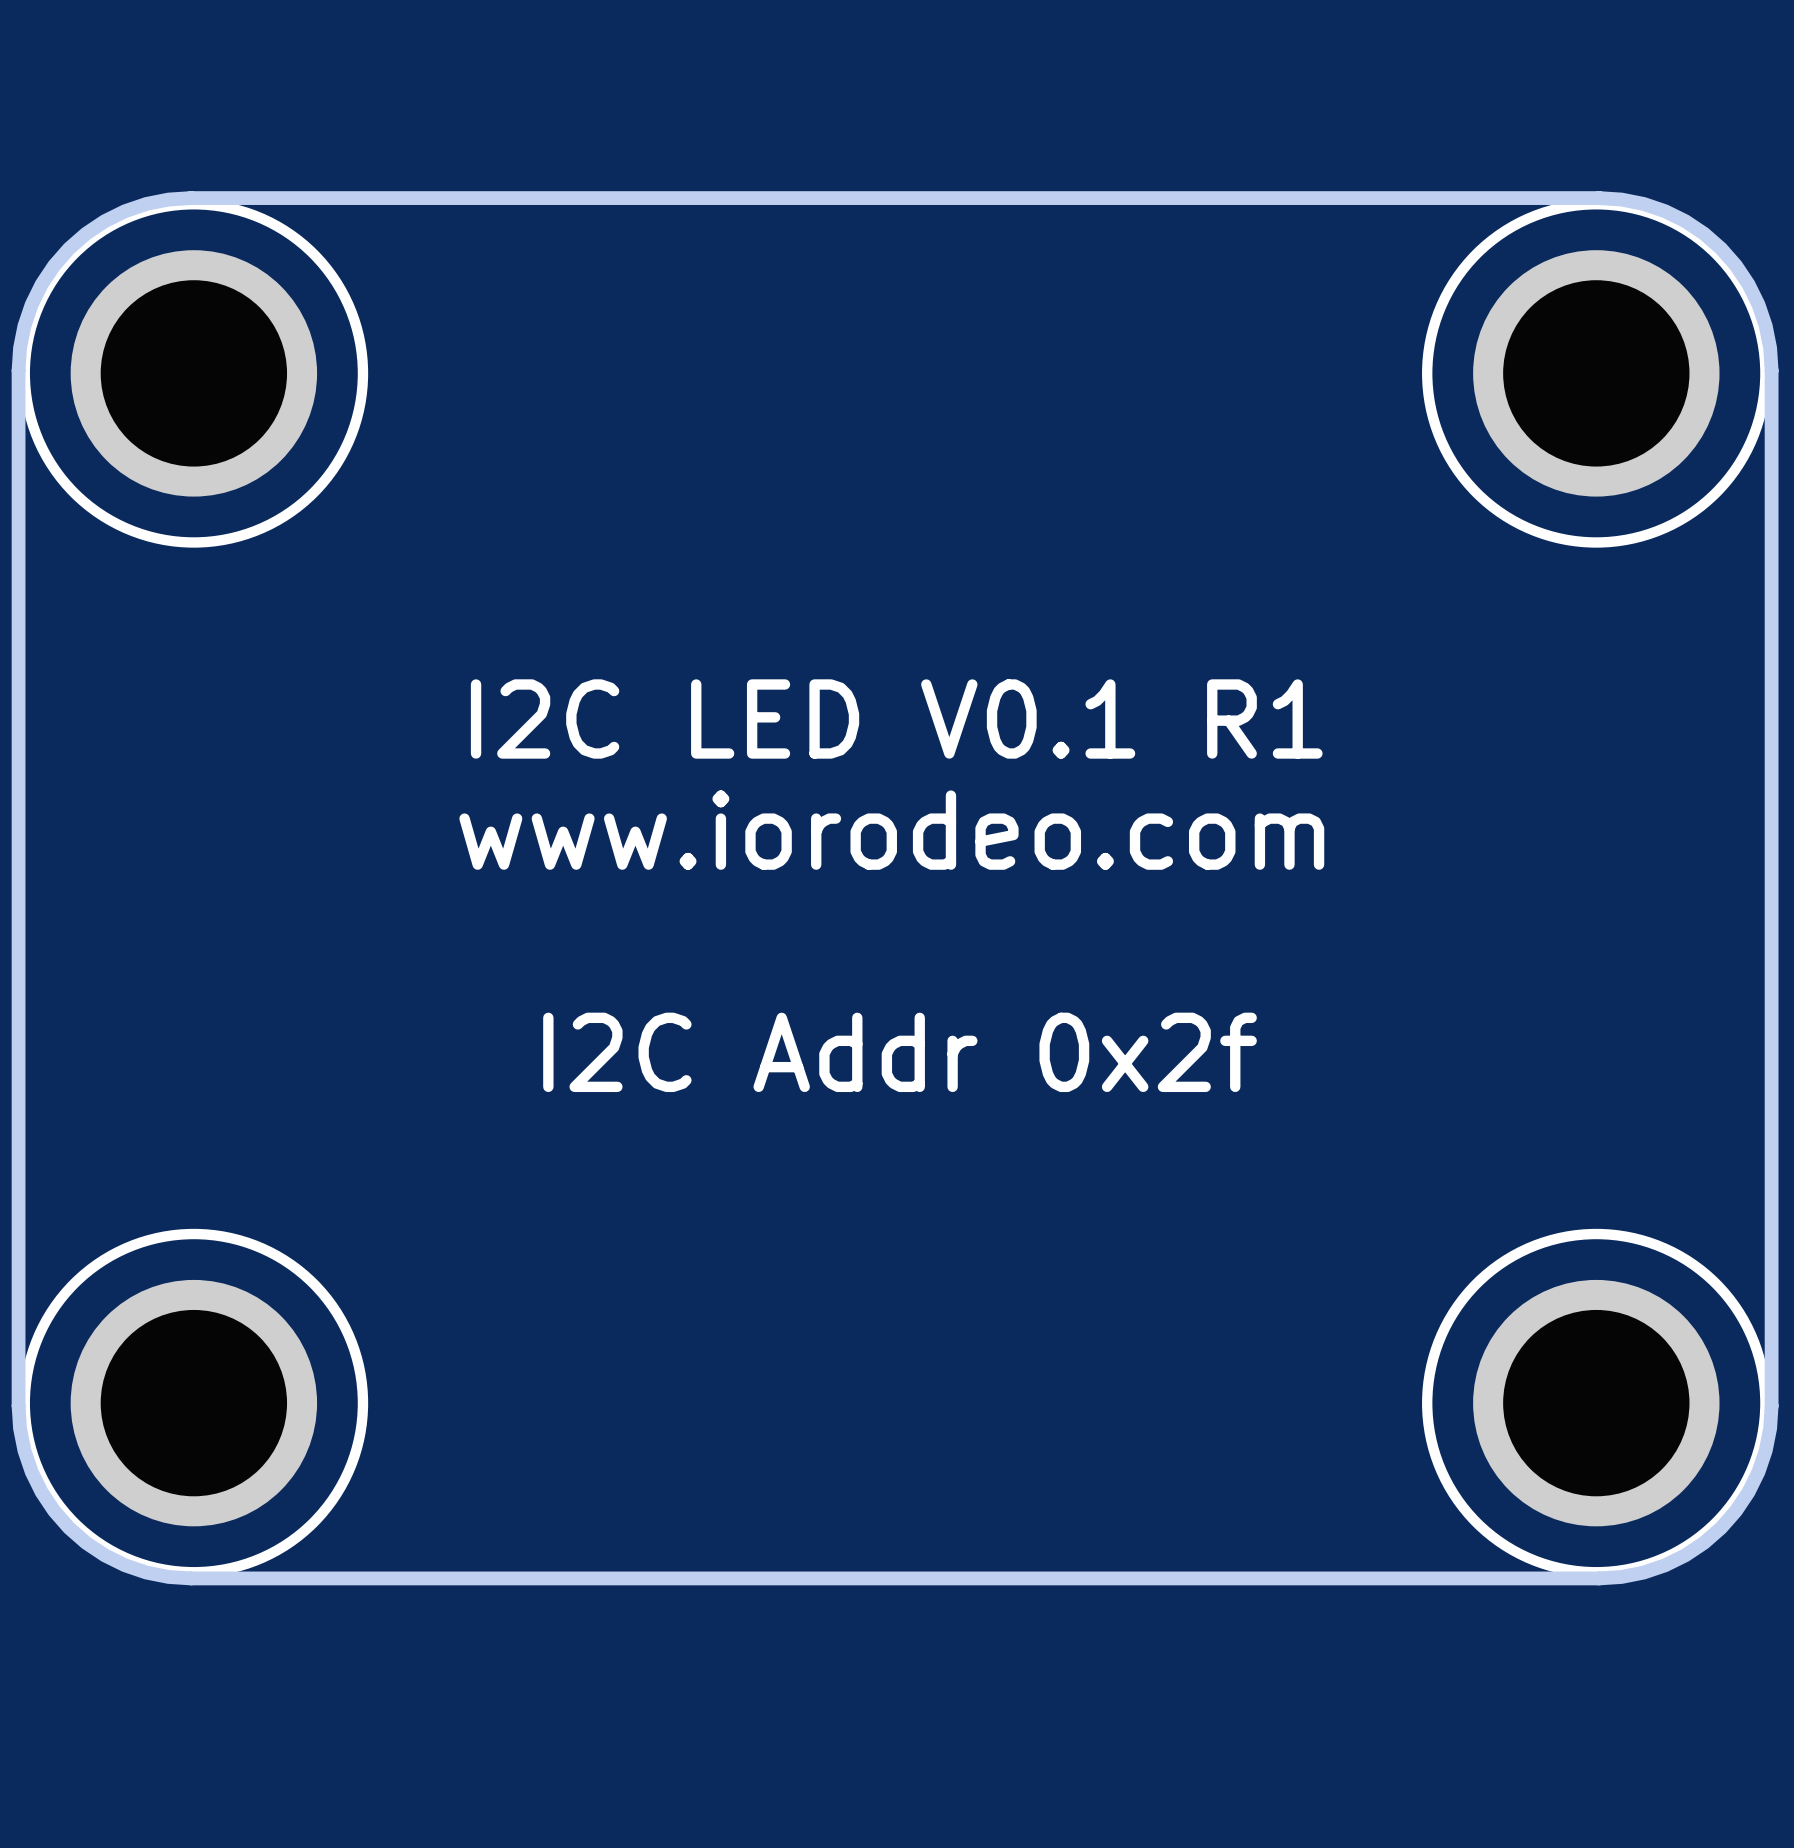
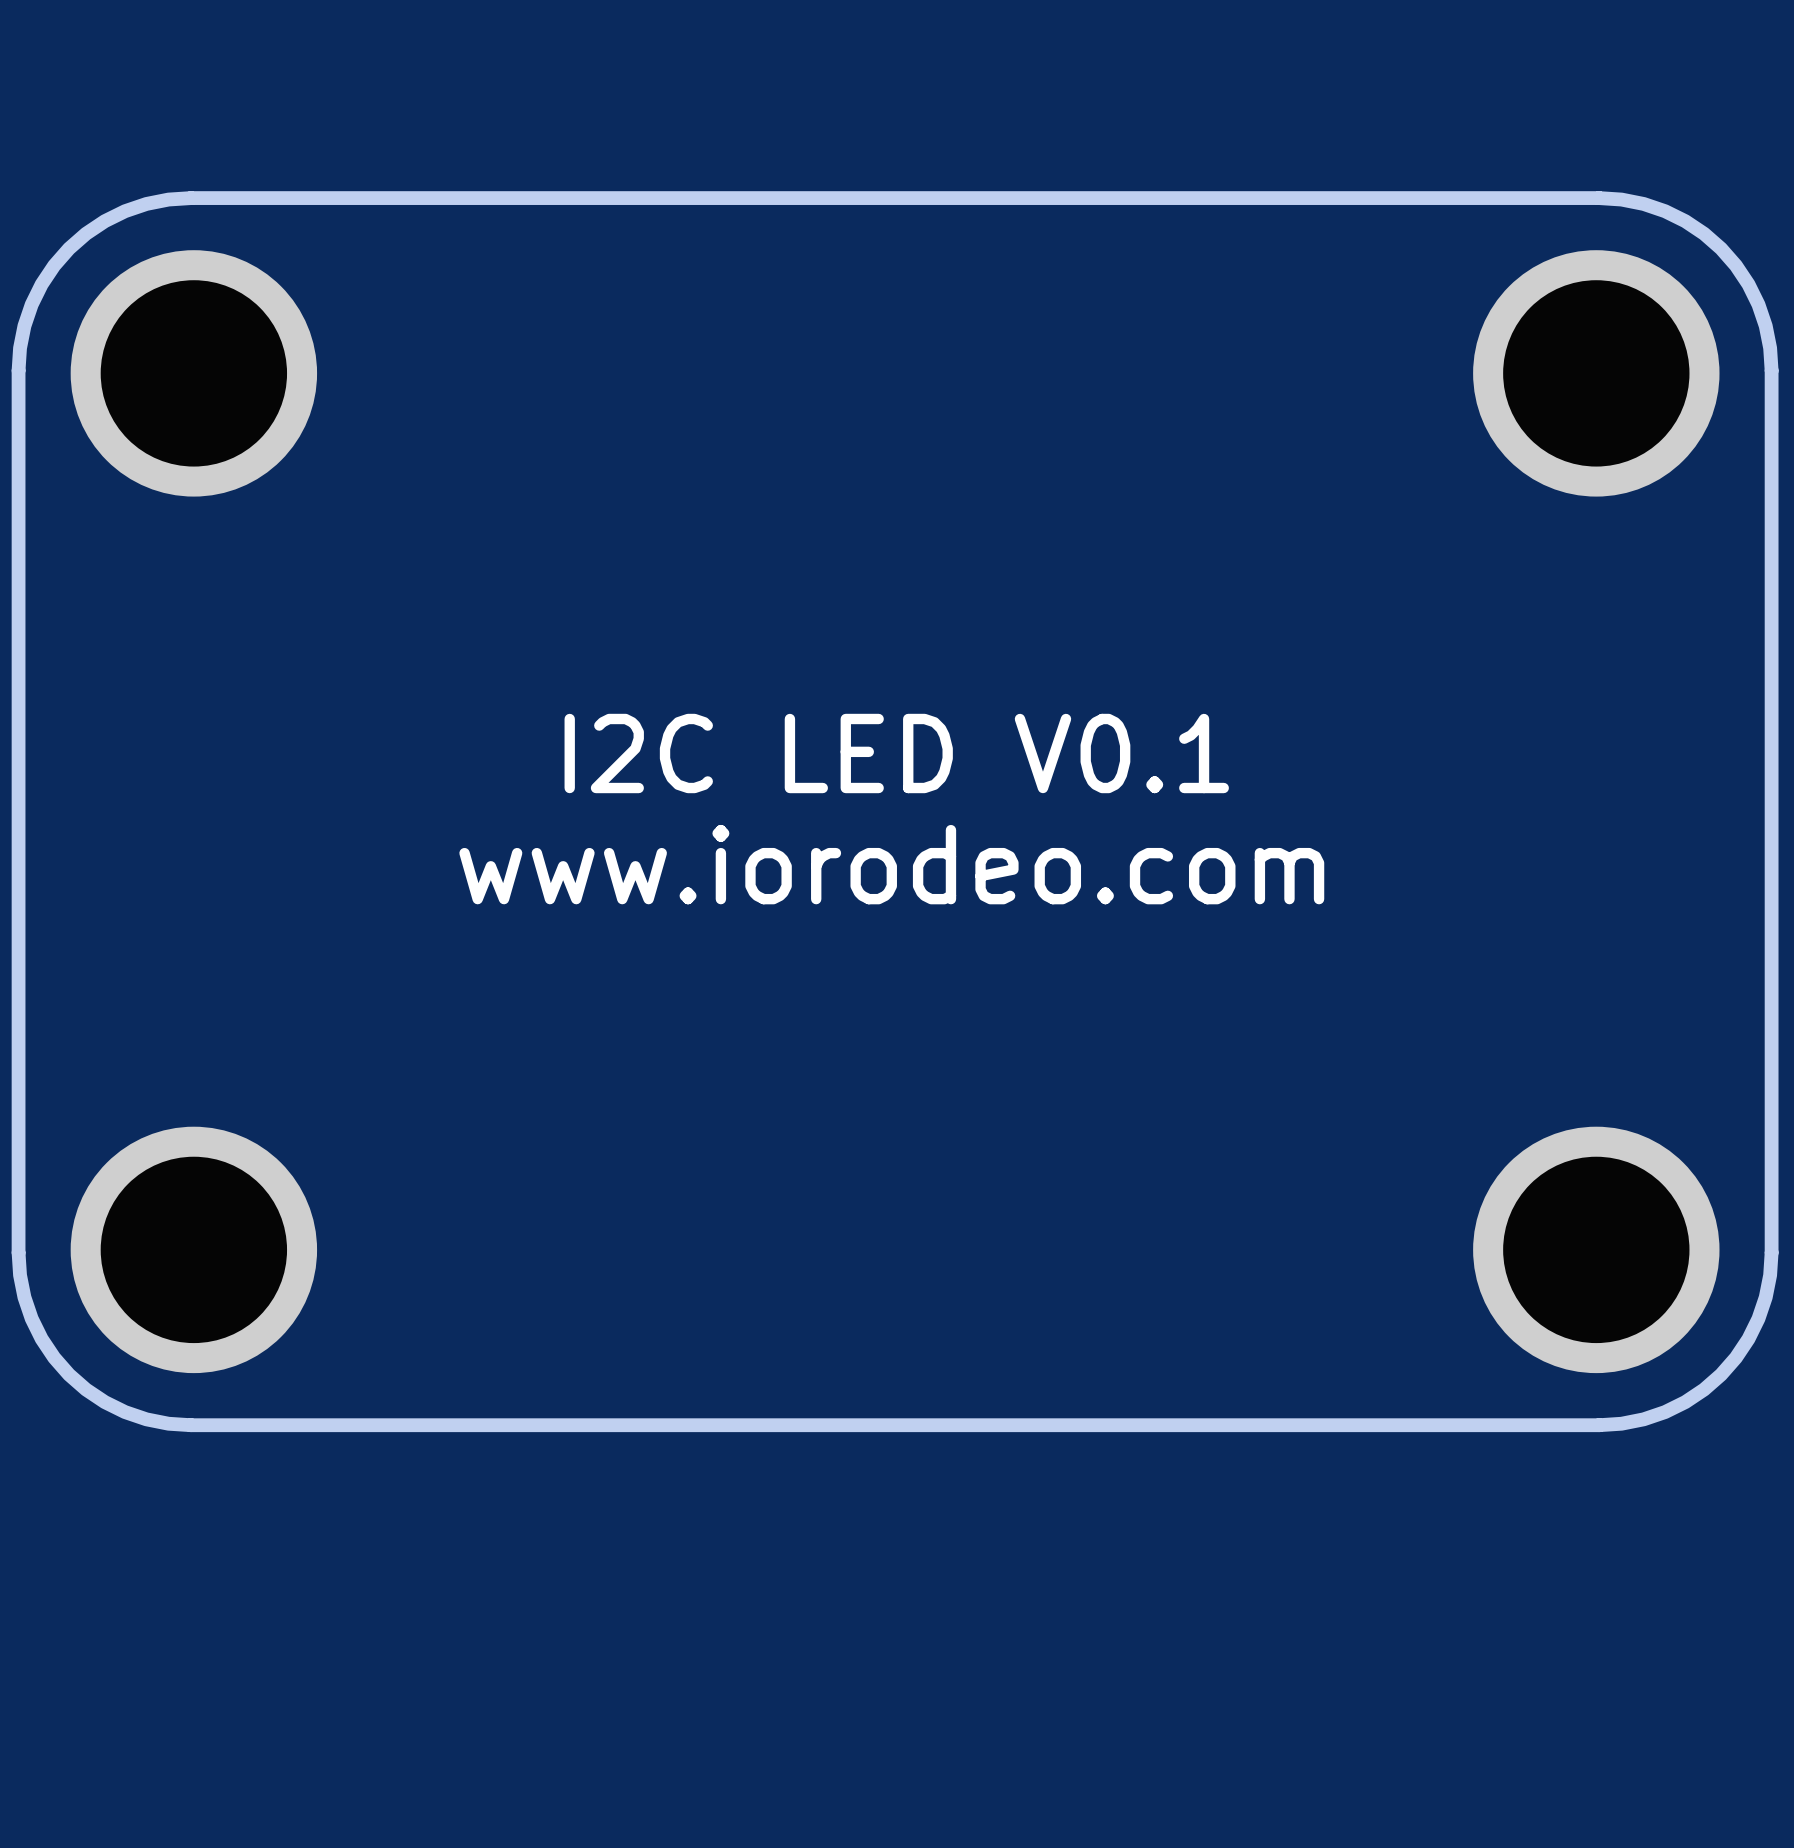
part footprint: [19, 199, 369, 548] -> [70, 250, 318, 497]
part footprint: [1422, 199, 1771, 548] -> [1473, 250, 1720, 497]
text: I2C LED V0.1 R1 (896, 718) -> I2C LED V0.1 (896, 753)
text position: www.iorodeo.com (891, 830) -> www.iorodeo.com (891, 864)
text: I2C Addr 0x2f (900, 1052) -> none
part: none -> (193, 1249)
part: none -> (1596, 1249)
board edge: (1771, 1252) (1770, 1428) (1758, 1471) (1748, 1492) (1721, 1527) (1685, 1555) (1643, 1572) (1599, 1578) (191, 1578) (146, 1572) (125, 1565) (86, 1542) (54, 1510) (31, 1471) (20, 1428) (18, 1405) (18, 1252) -> (1771, 1252) (1770, 1275) (1758, 1318) (1735, 1357) (1721, 1374) (1704, 1389) (1665, 1412) (1621, 1423) (1599, 1425) (168, 1423) (125, 1412) (104, 1402) (86, 1389) (54, 1357) (31, 1318) (24, 1297) (18, 1252)
part: (193, 1403) -> none
part: (1596, 1403) -> none

